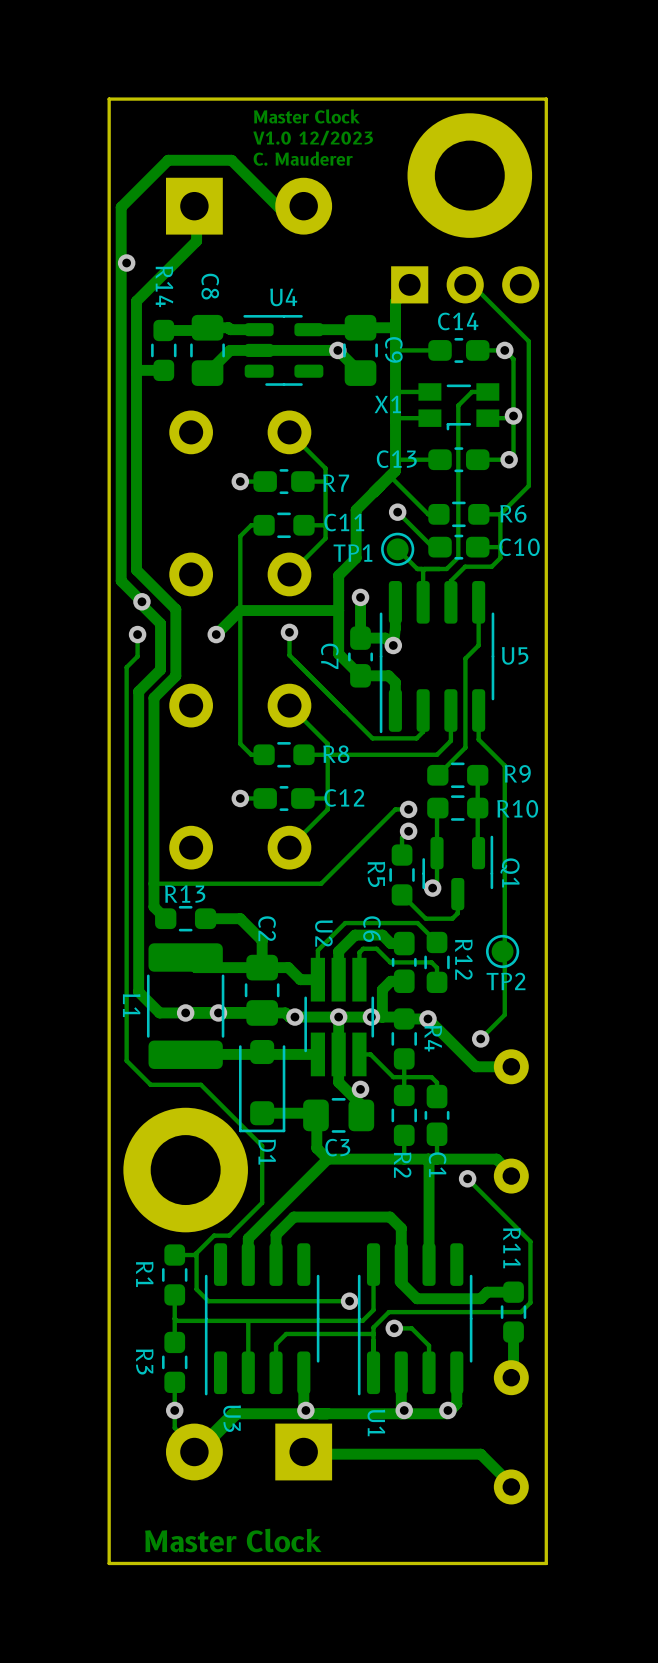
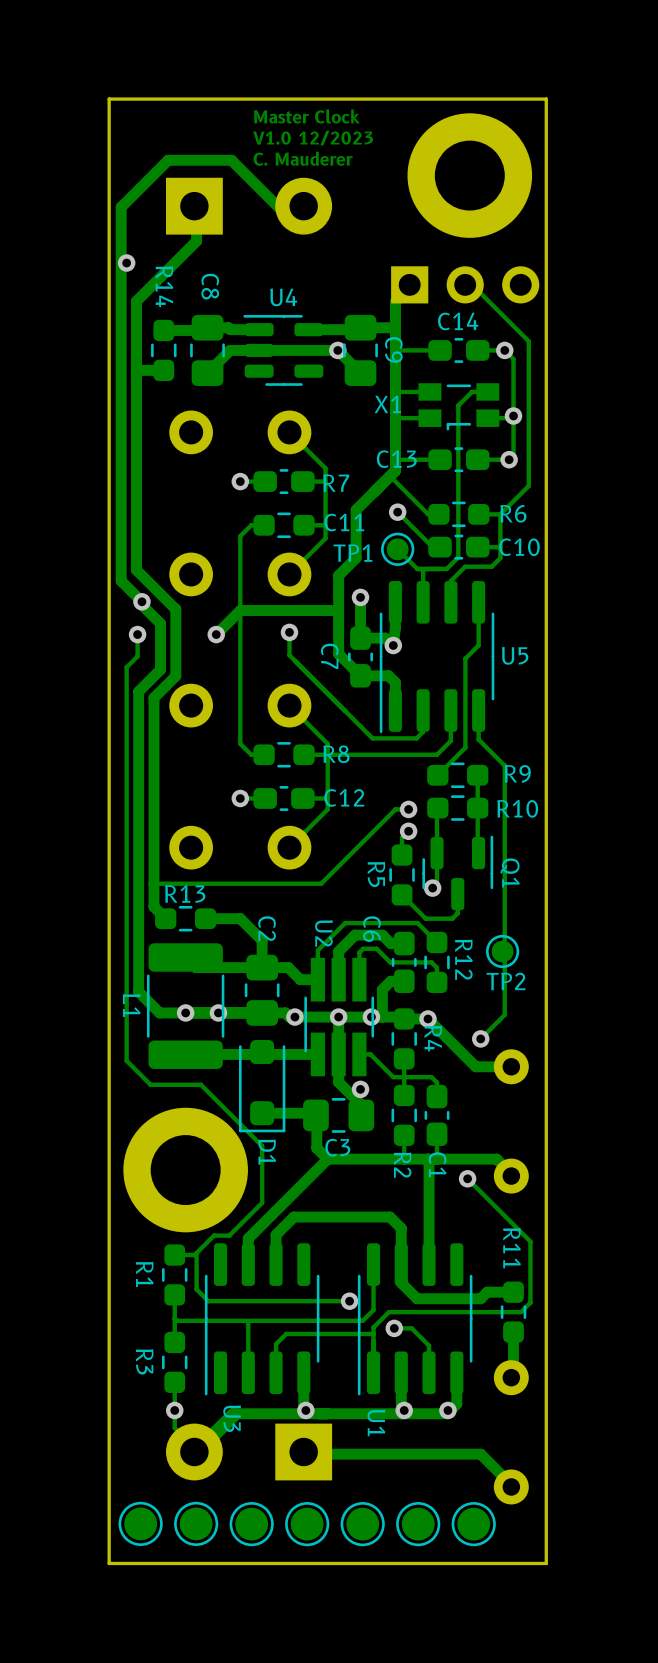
part: none -> (140, 1523)
part: none -> (196, 1523)
part: none -> (251, 1524)
part: none -> (307, 1524)
part: none -> (362, 1524)
part: none -> (418, 1524)
part: none -> (473, 1524)
text: Master Clock (233, 1540) -> none

